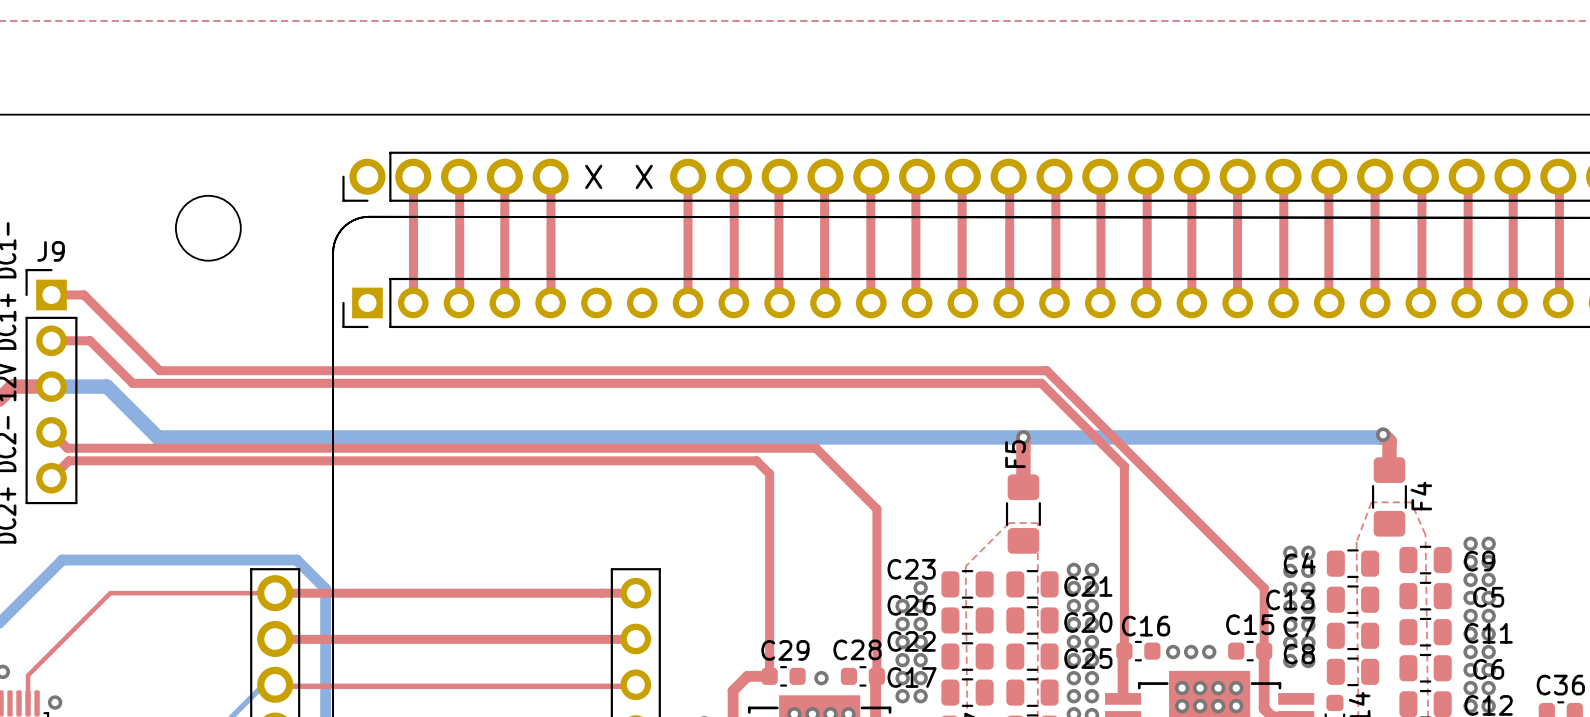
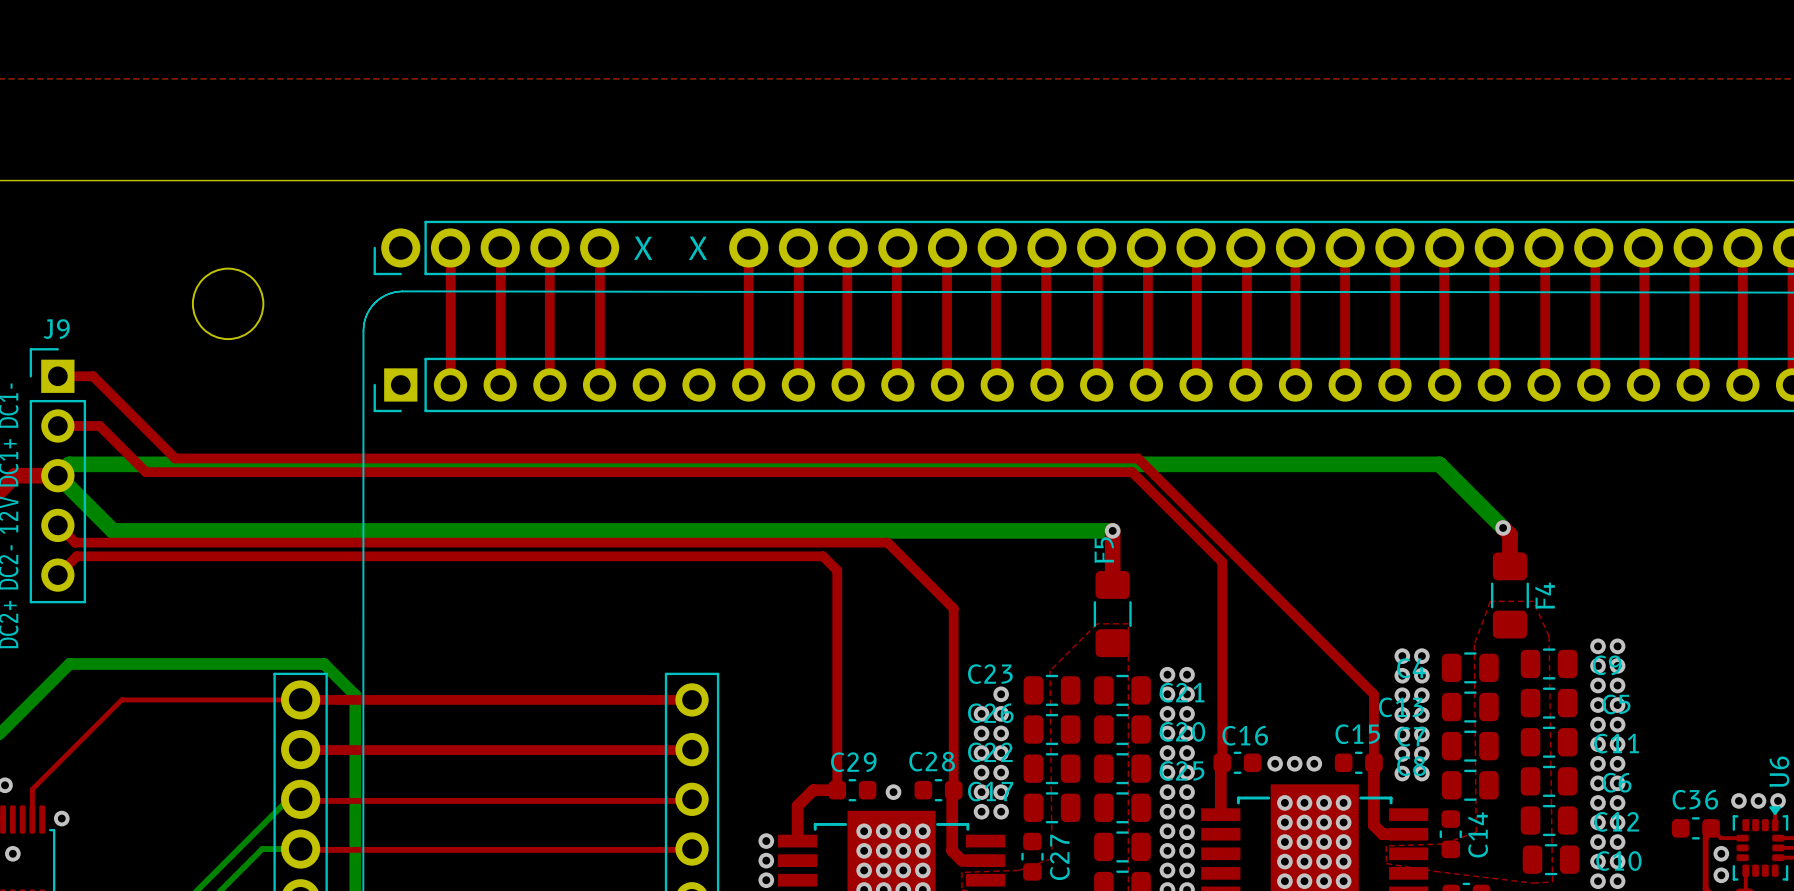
bottom track: (51, 386) (107, 386) (157, 437) -> none
bottom track: (1383, 434) (1380, 437) (1023, 437) -> (1503, 527) (1439, 464) (69, 464) (57, 475) (113, 530) (173, 530)

